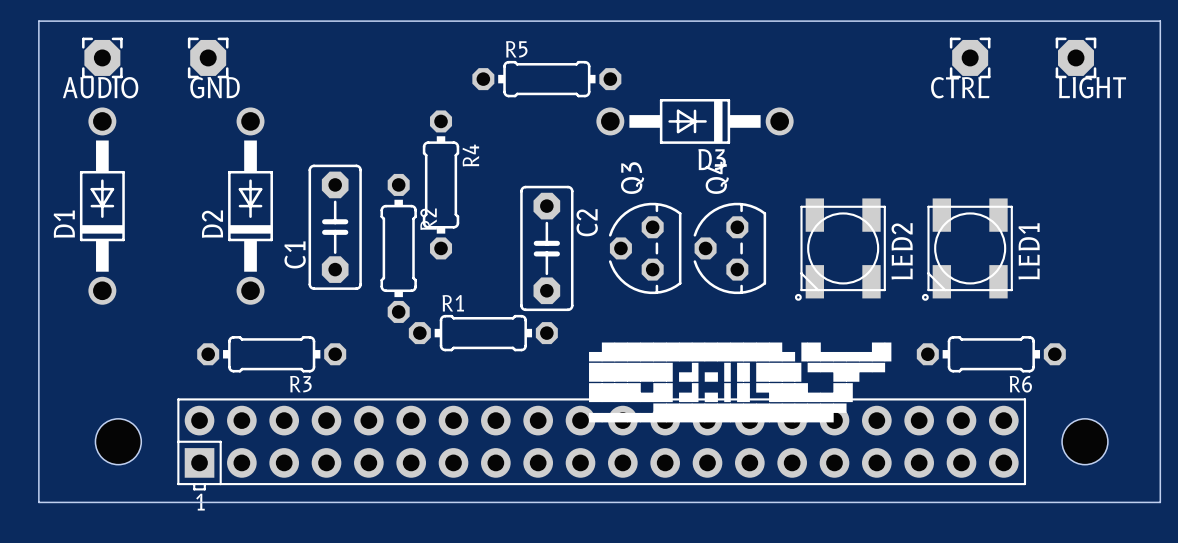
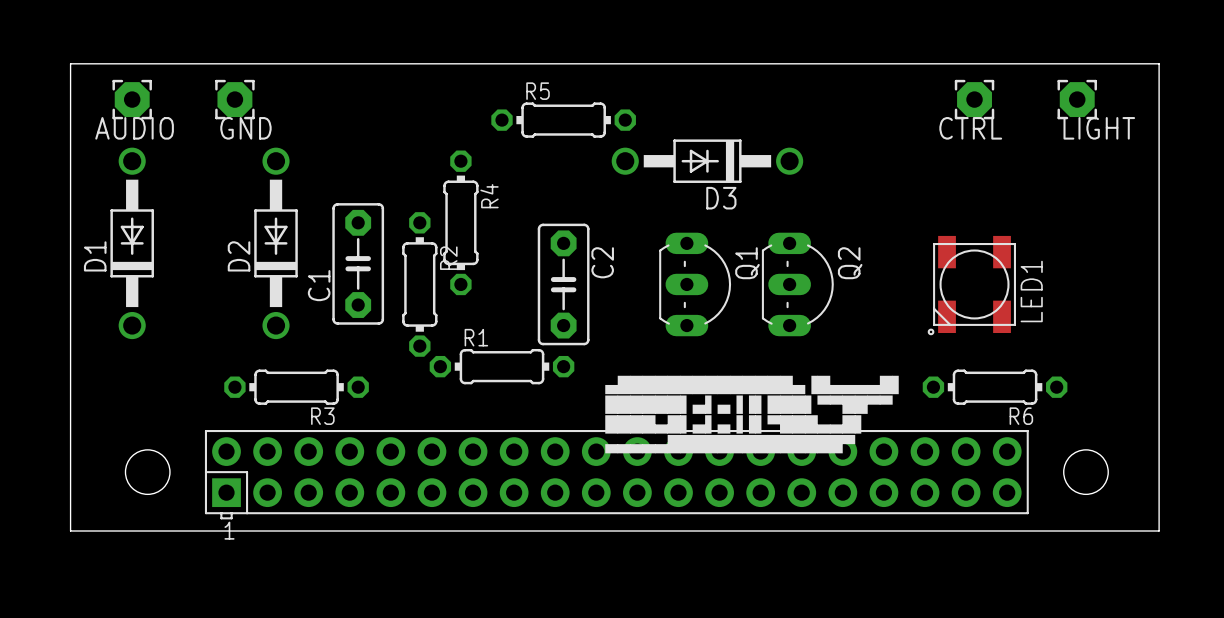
Q3: (645, 248) -> none
Q1: none -> (695, 284)
Q4: (729, 248) -> none
Q2: none -> (797, 284)
LED2: (840, 249) -> none

